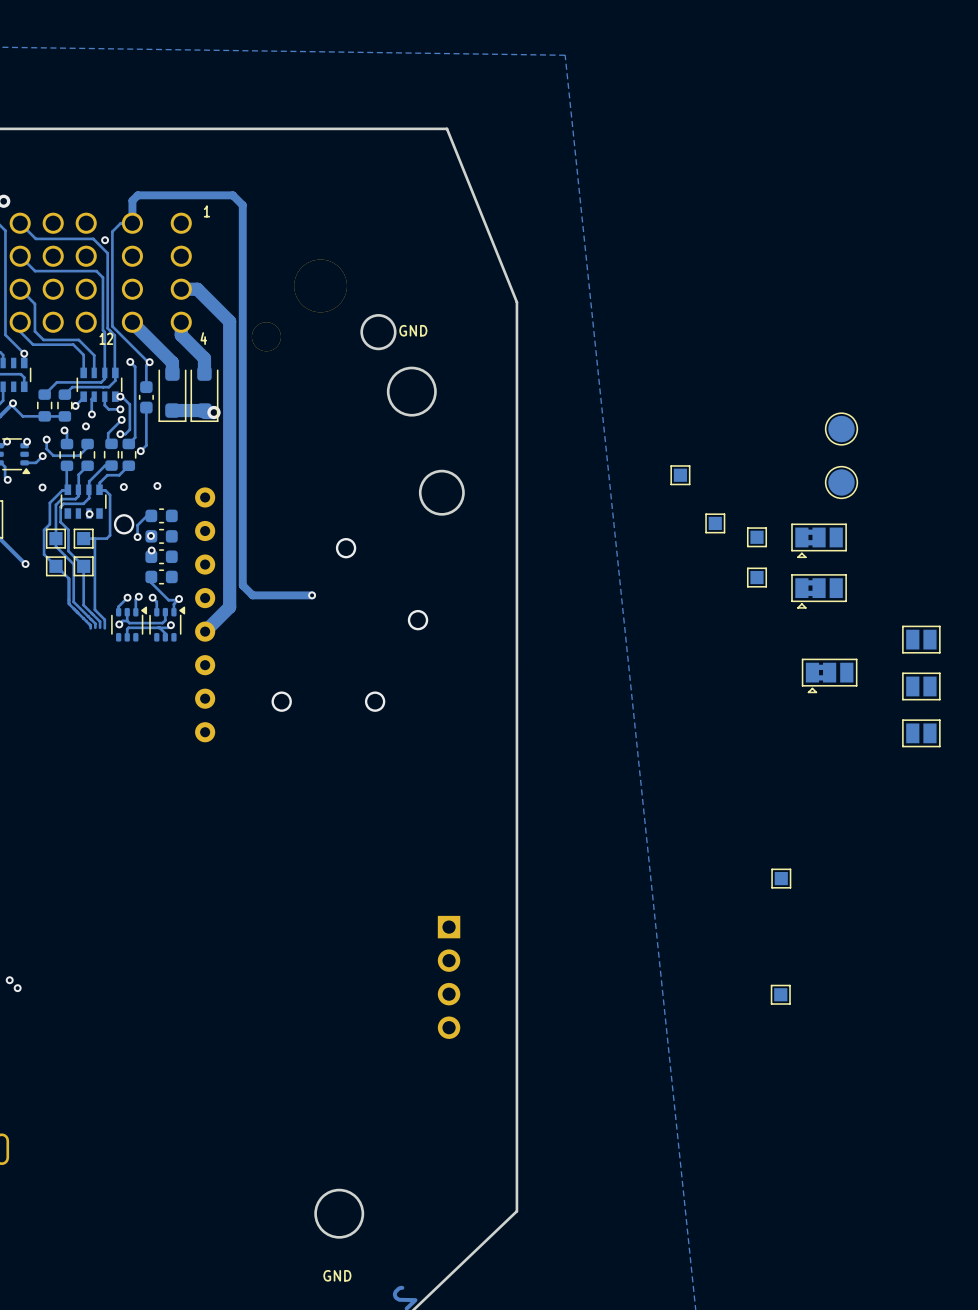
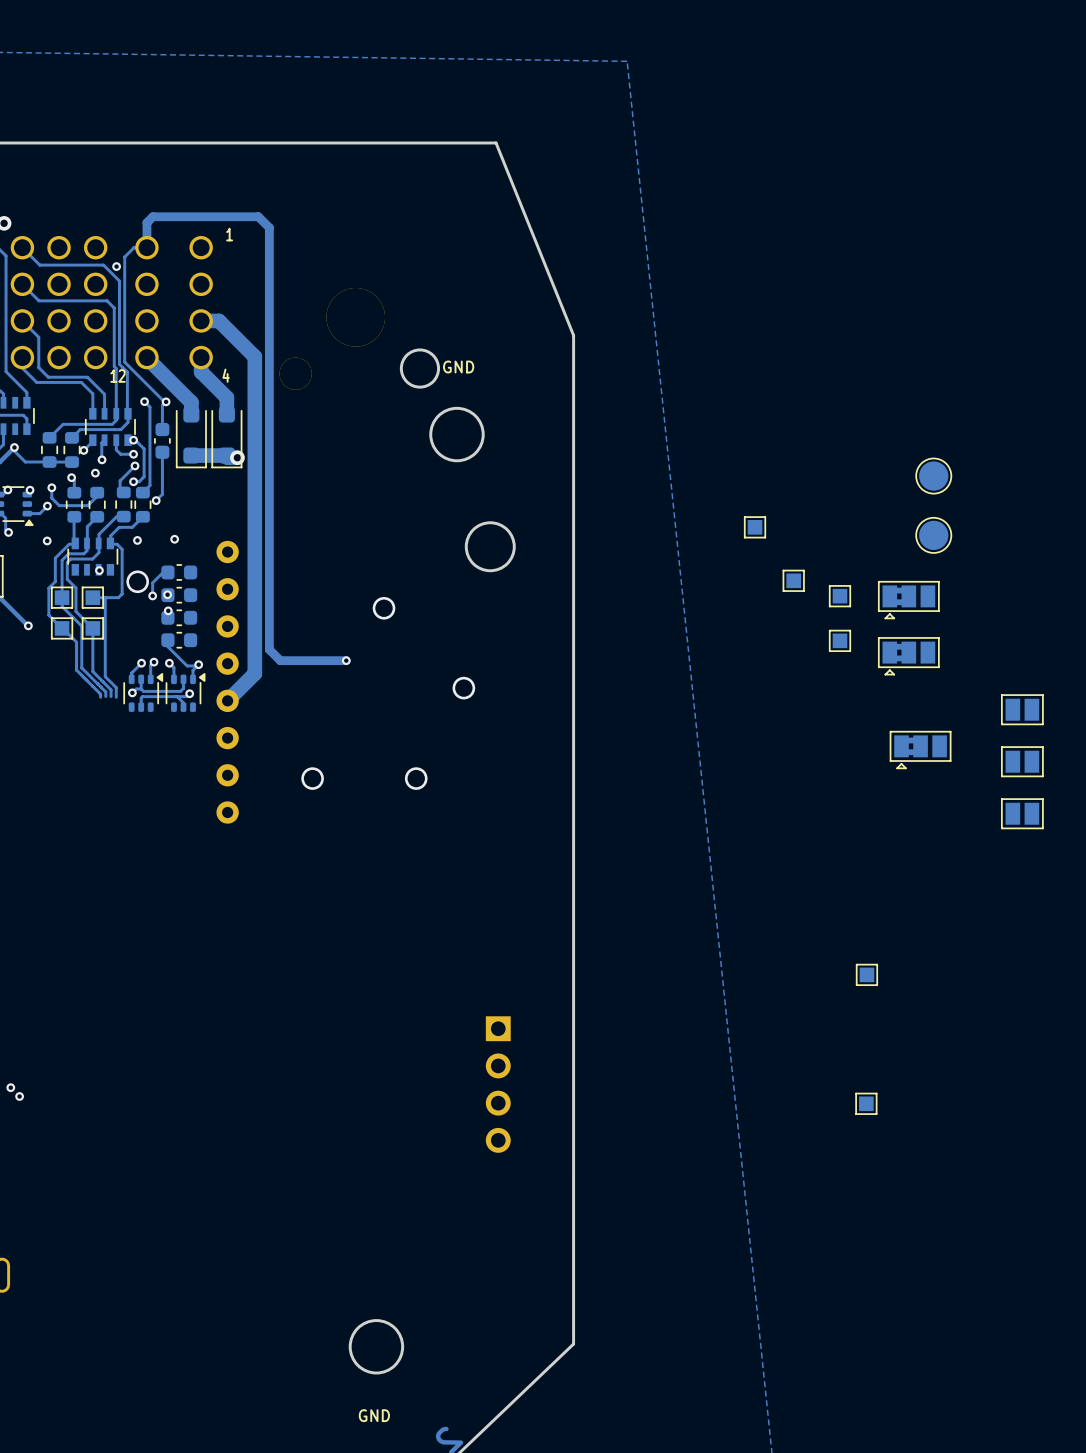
via: (24, 353) -> none

